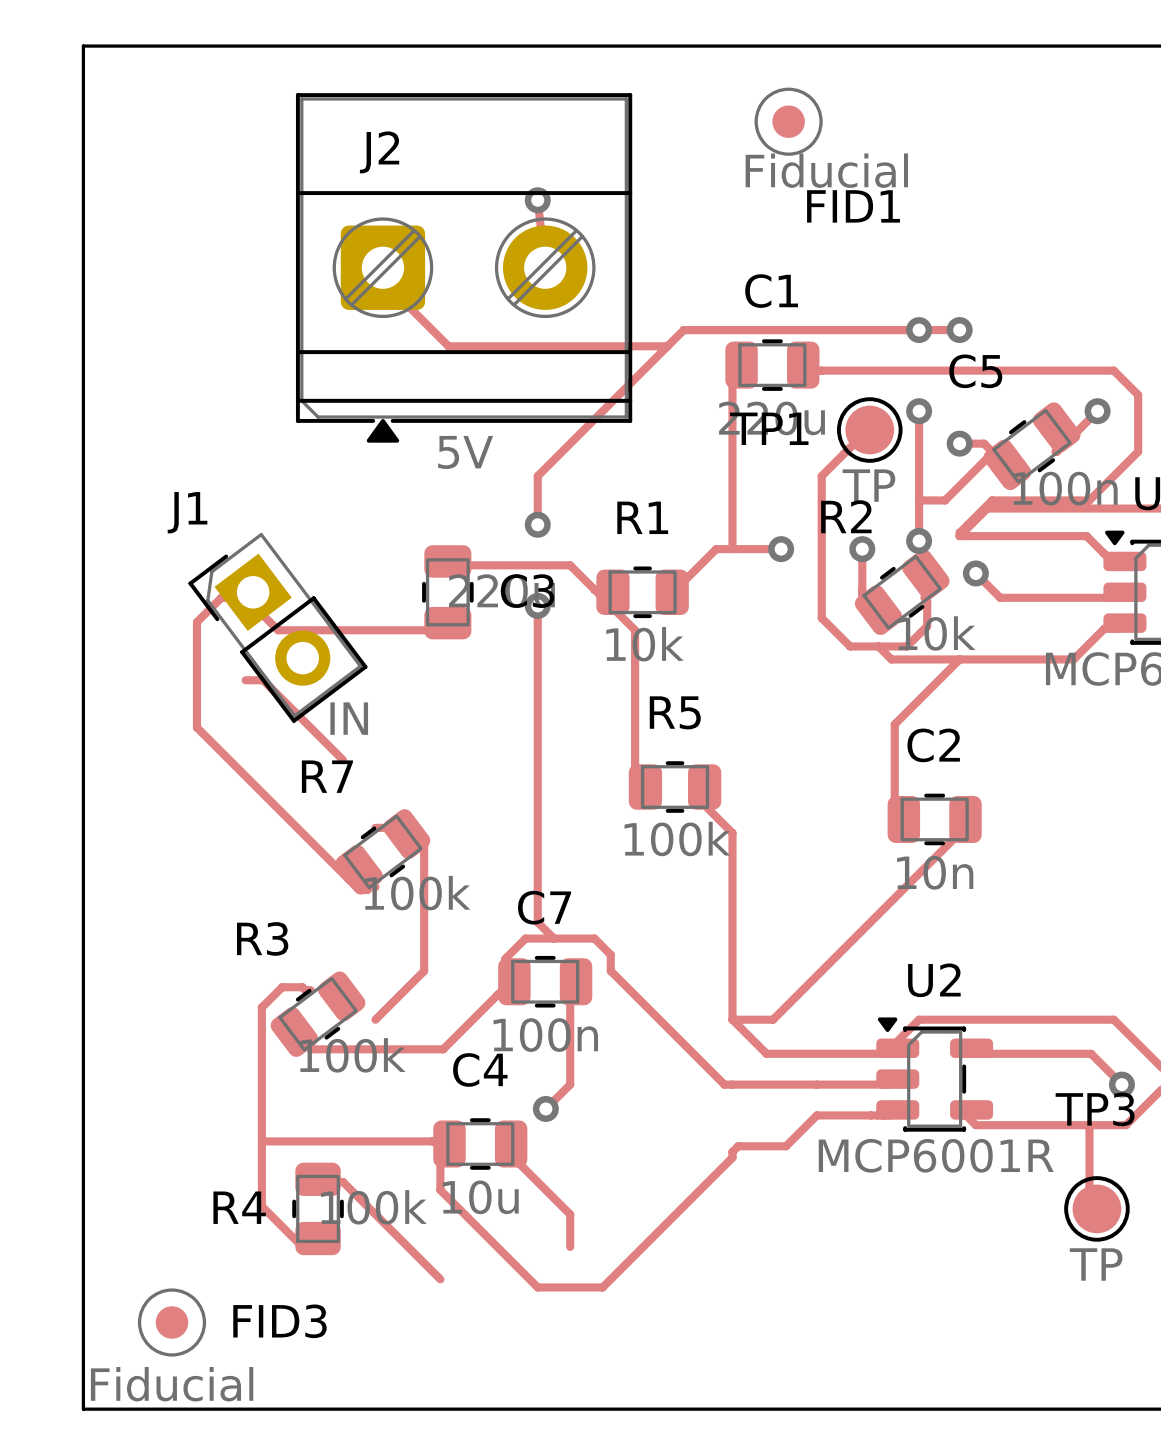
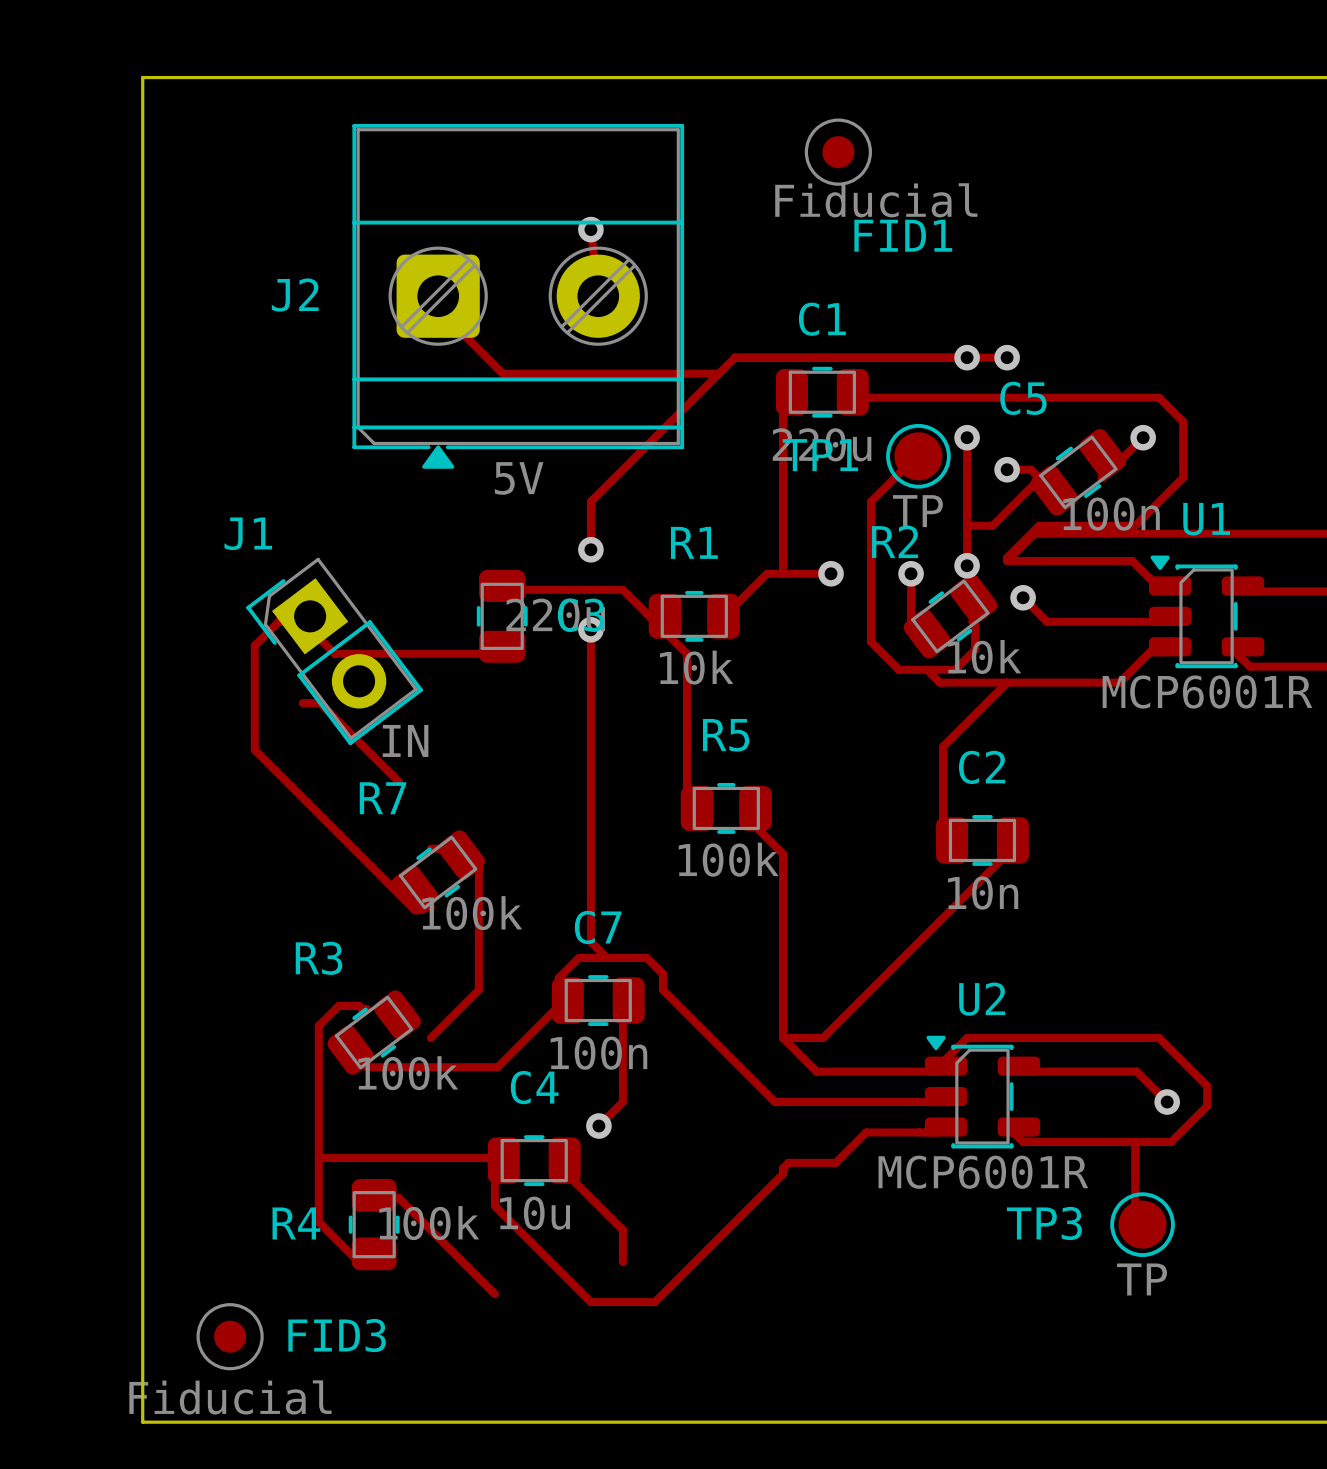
J2 name position: J2 (379, 152) -> J2 (295, 295)
TP3 name position: TP3 (1095, 1109) -> TP3 (1044, 1223)

